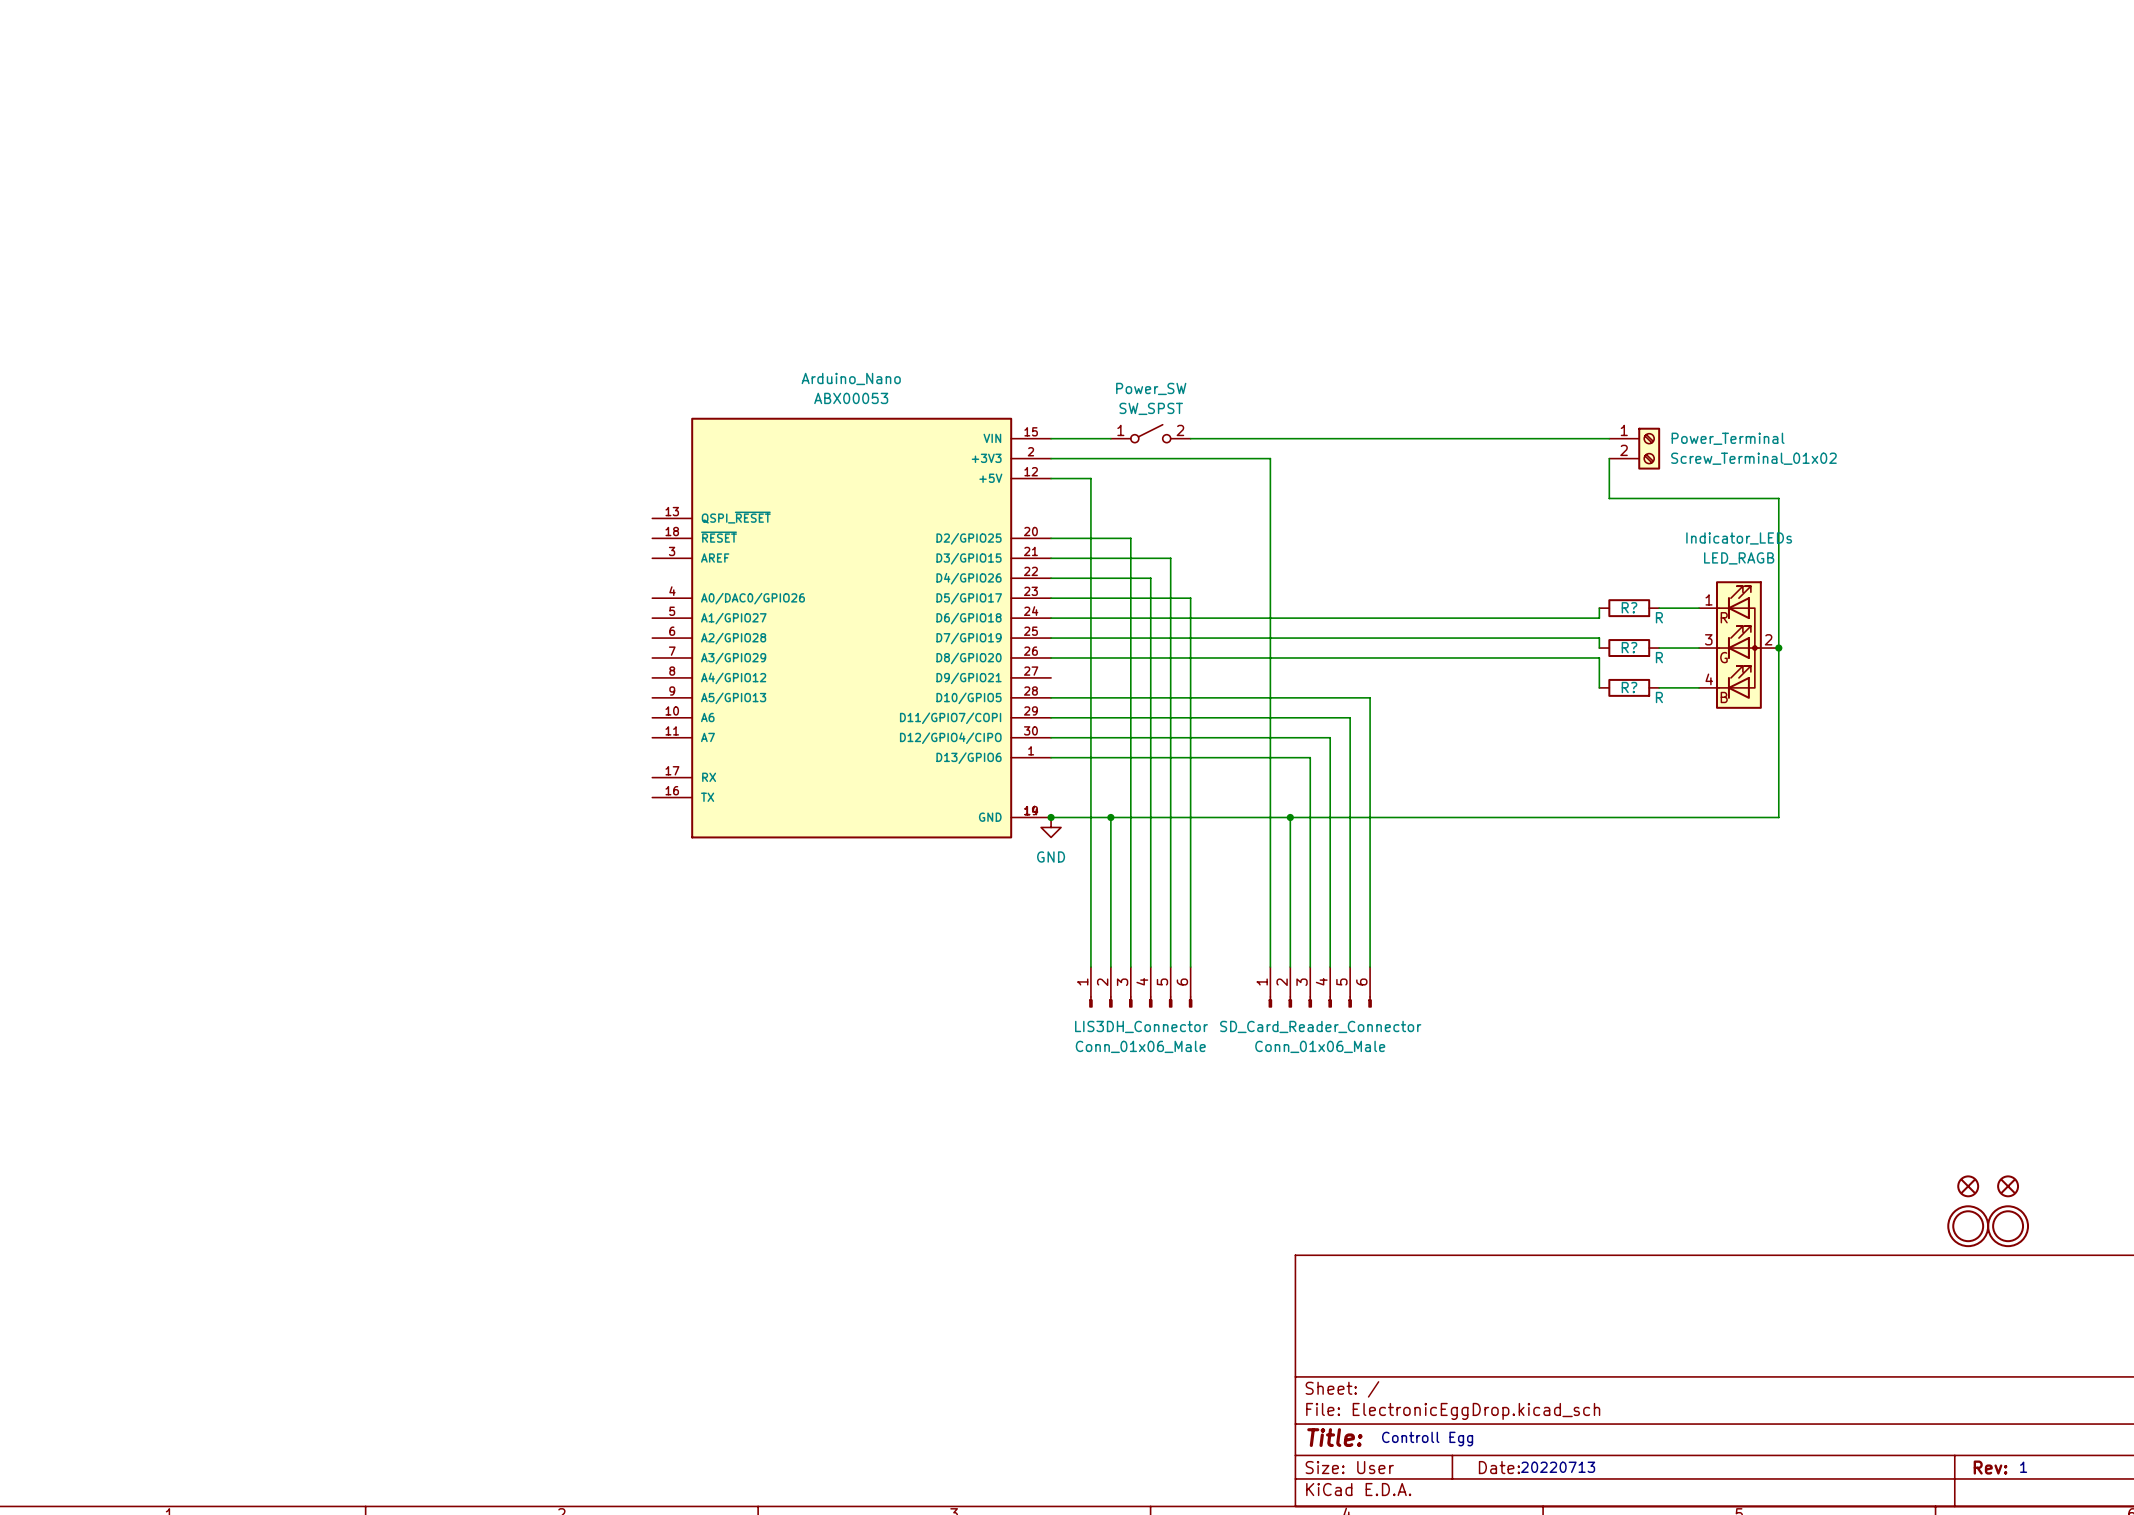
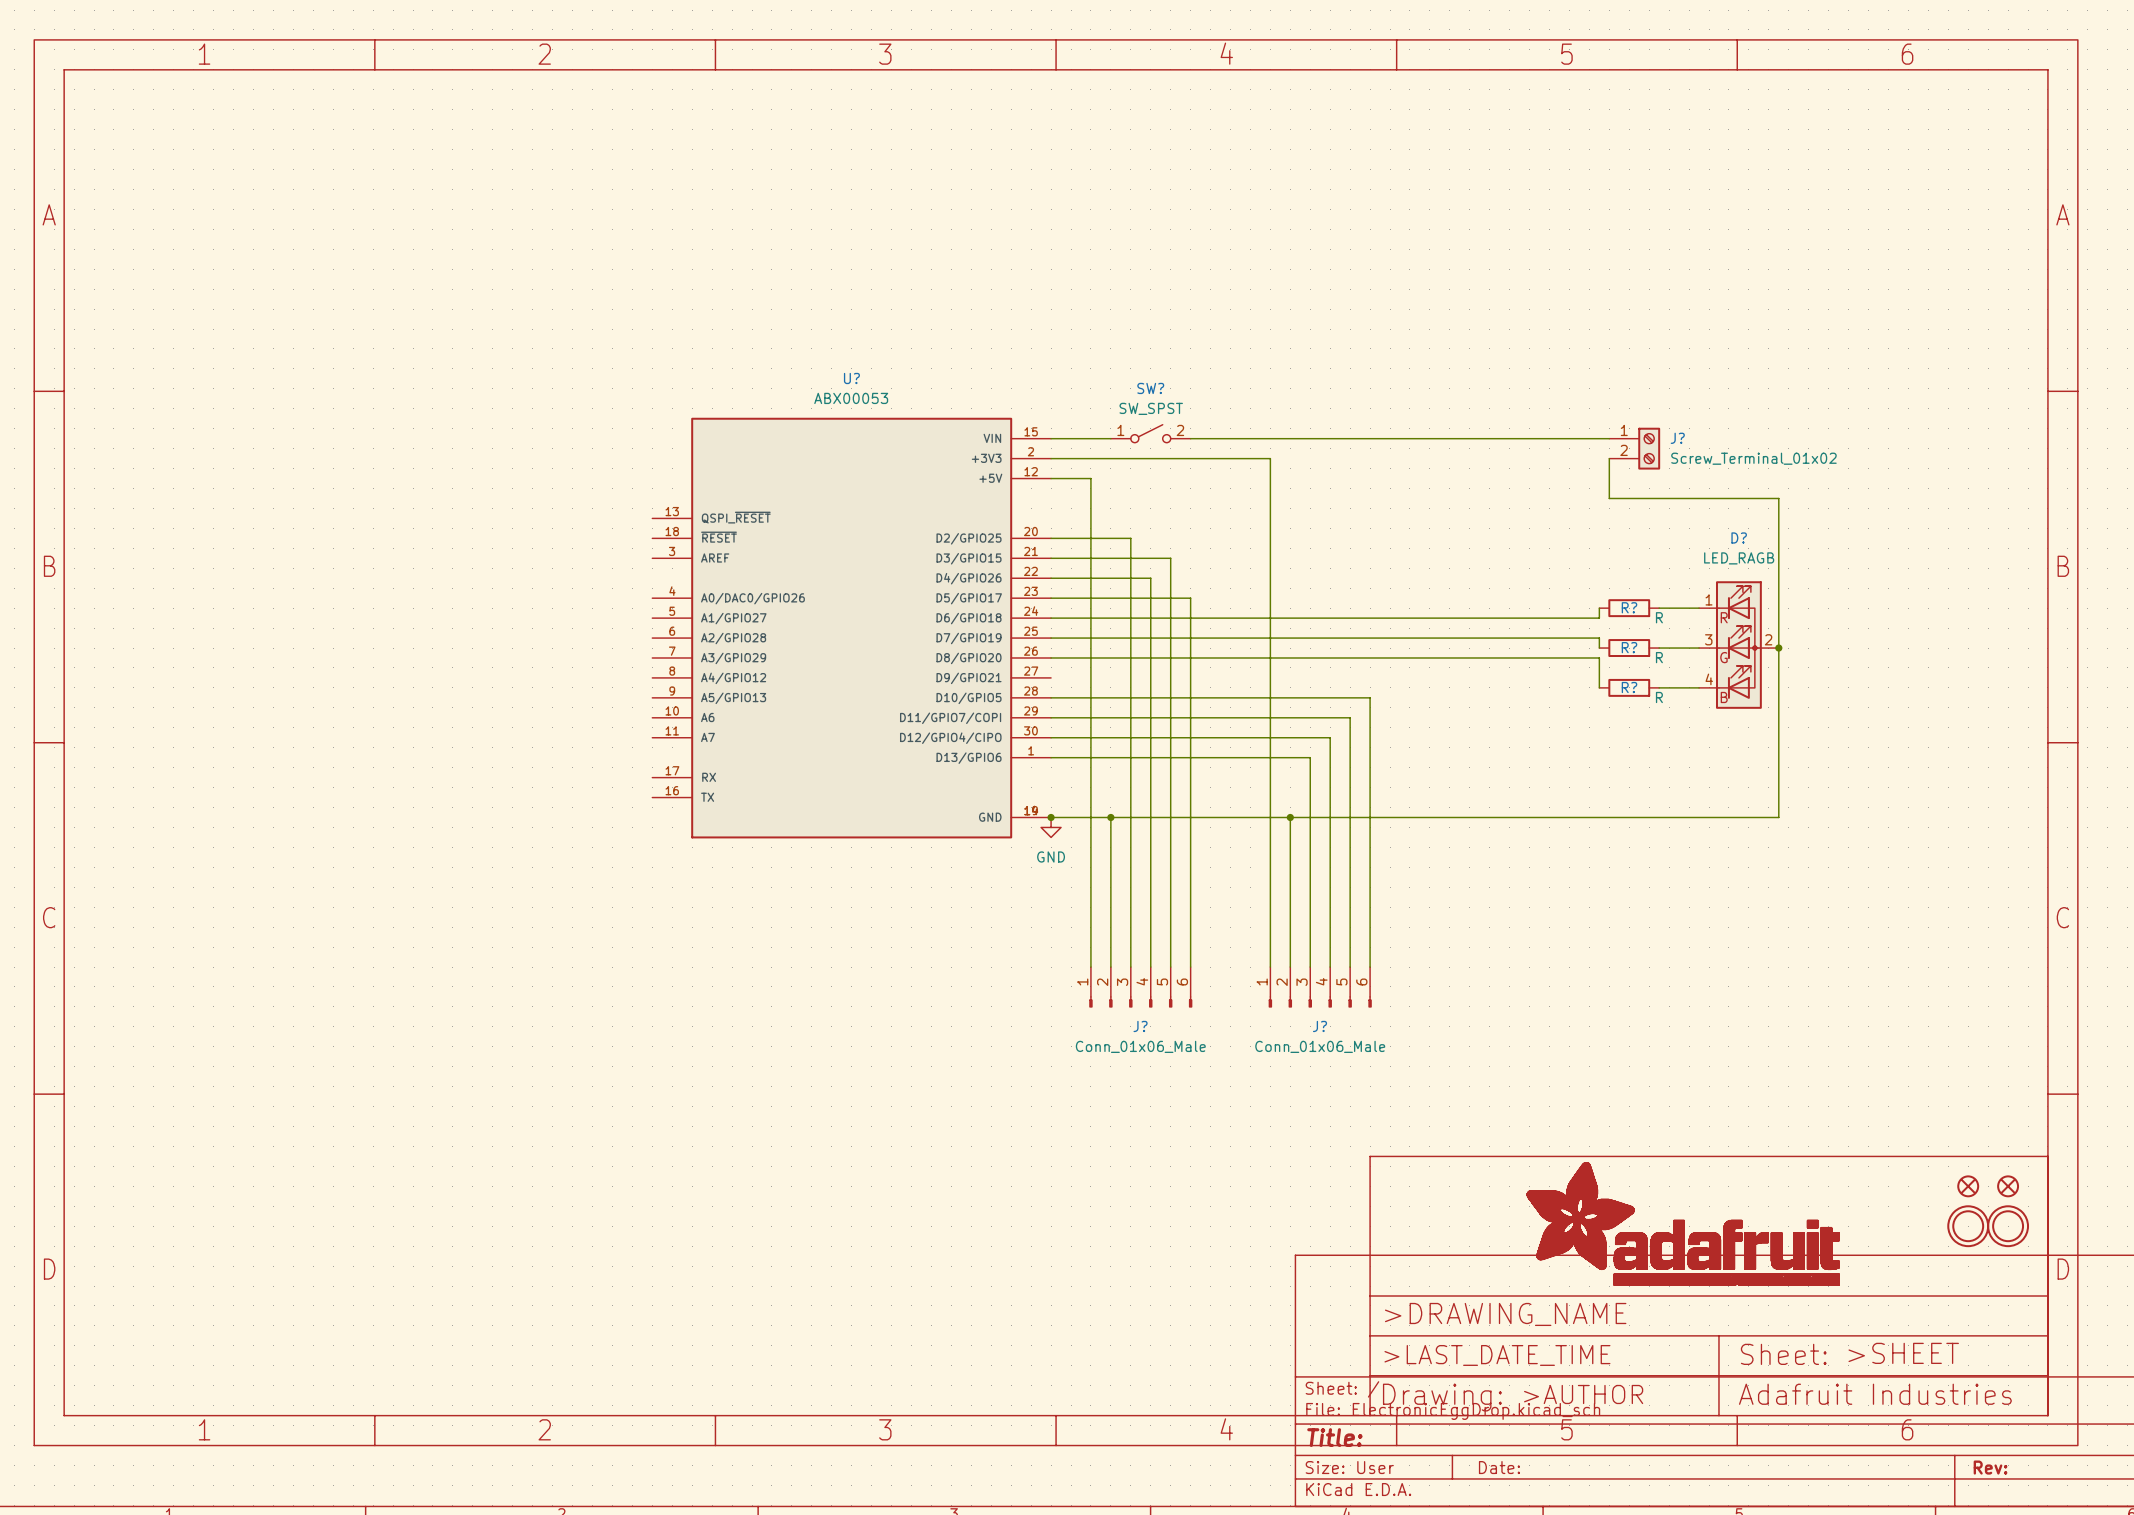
Arduino_Nano name: Arduino_Nano (851, 378) -> U? (851, 378)
Power_SW name: Power_SW (1151, 388) -> SW? (1150, 388)
Power_Terminal name: Power_Terminal (1728, 438) -> J? (1677, 438)
Indicator_LEDs name: Indicator_LEDs (1739, 538) -> D? (1739, 537)
power symbol: none -> (1056, 742)
LIS3DH_Connector name: LIS3DH_Connector (1141, 1026) -> J? (1140, 1026)
SD_Card_Reader_Connector name: SD_Card_Reader_Connector (1320, 1026) -> J? (1319, 1026)
text: Controll Egg (1427, 1439) -> none
text: 20220713 (1558, 1467) -> none
text: 1 (2023, 1467) -> none

